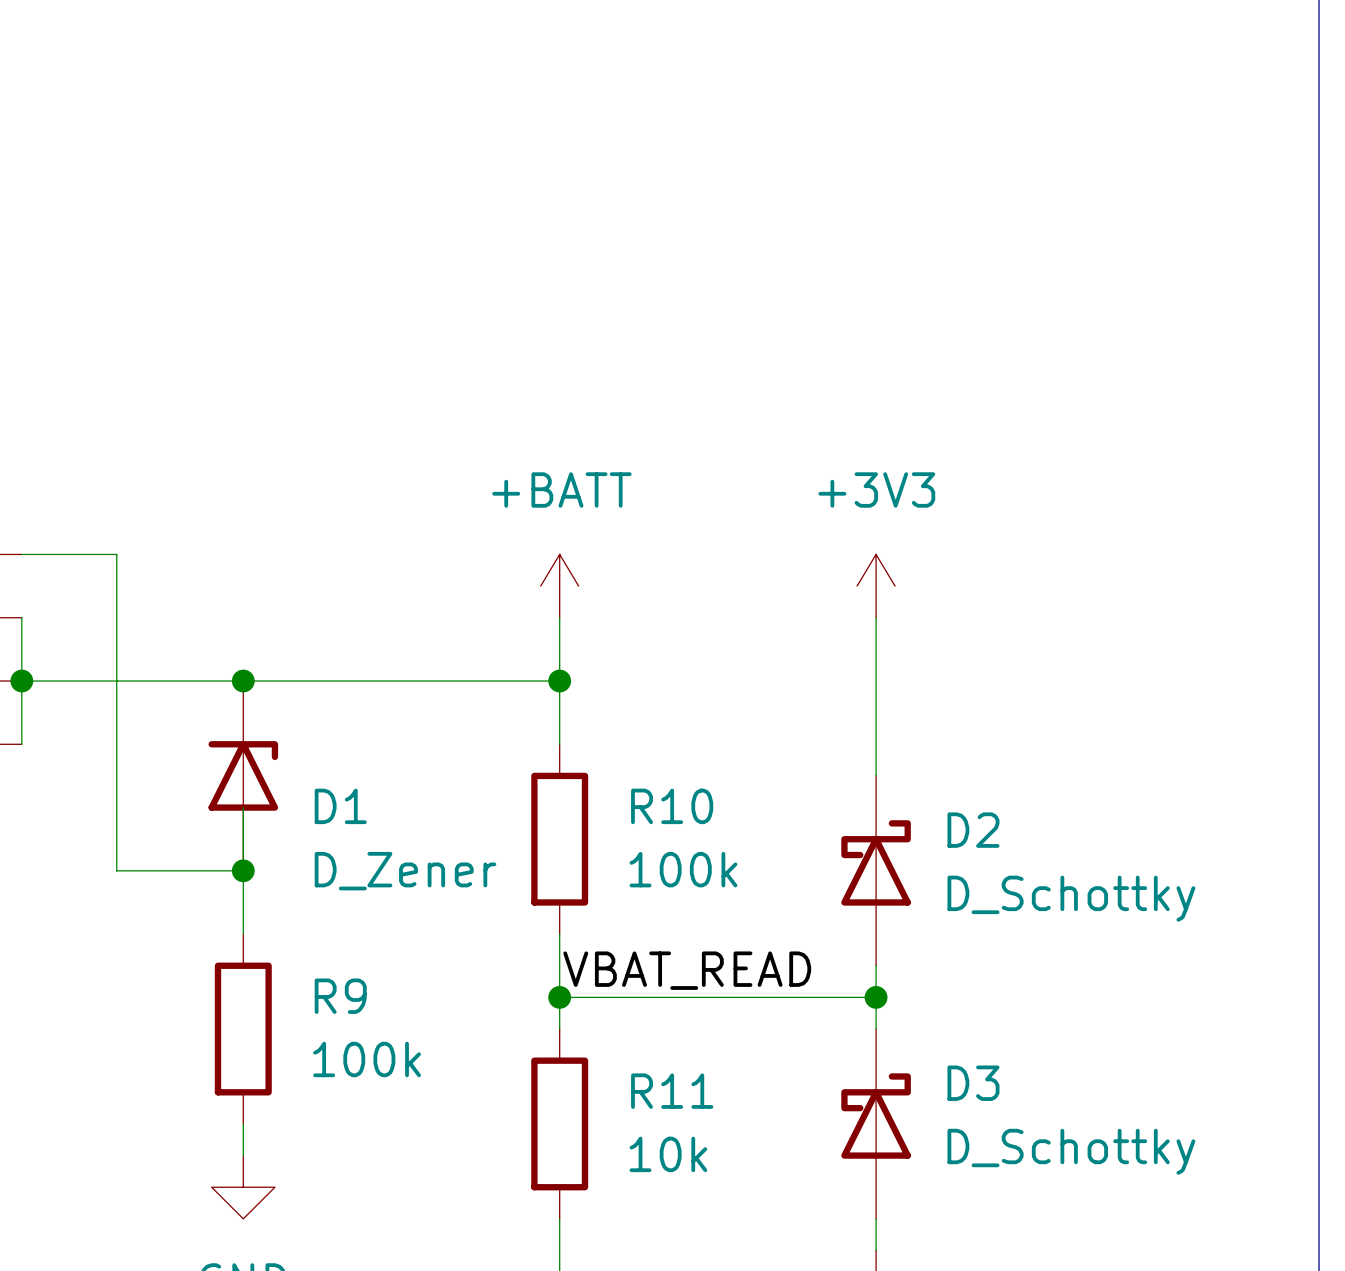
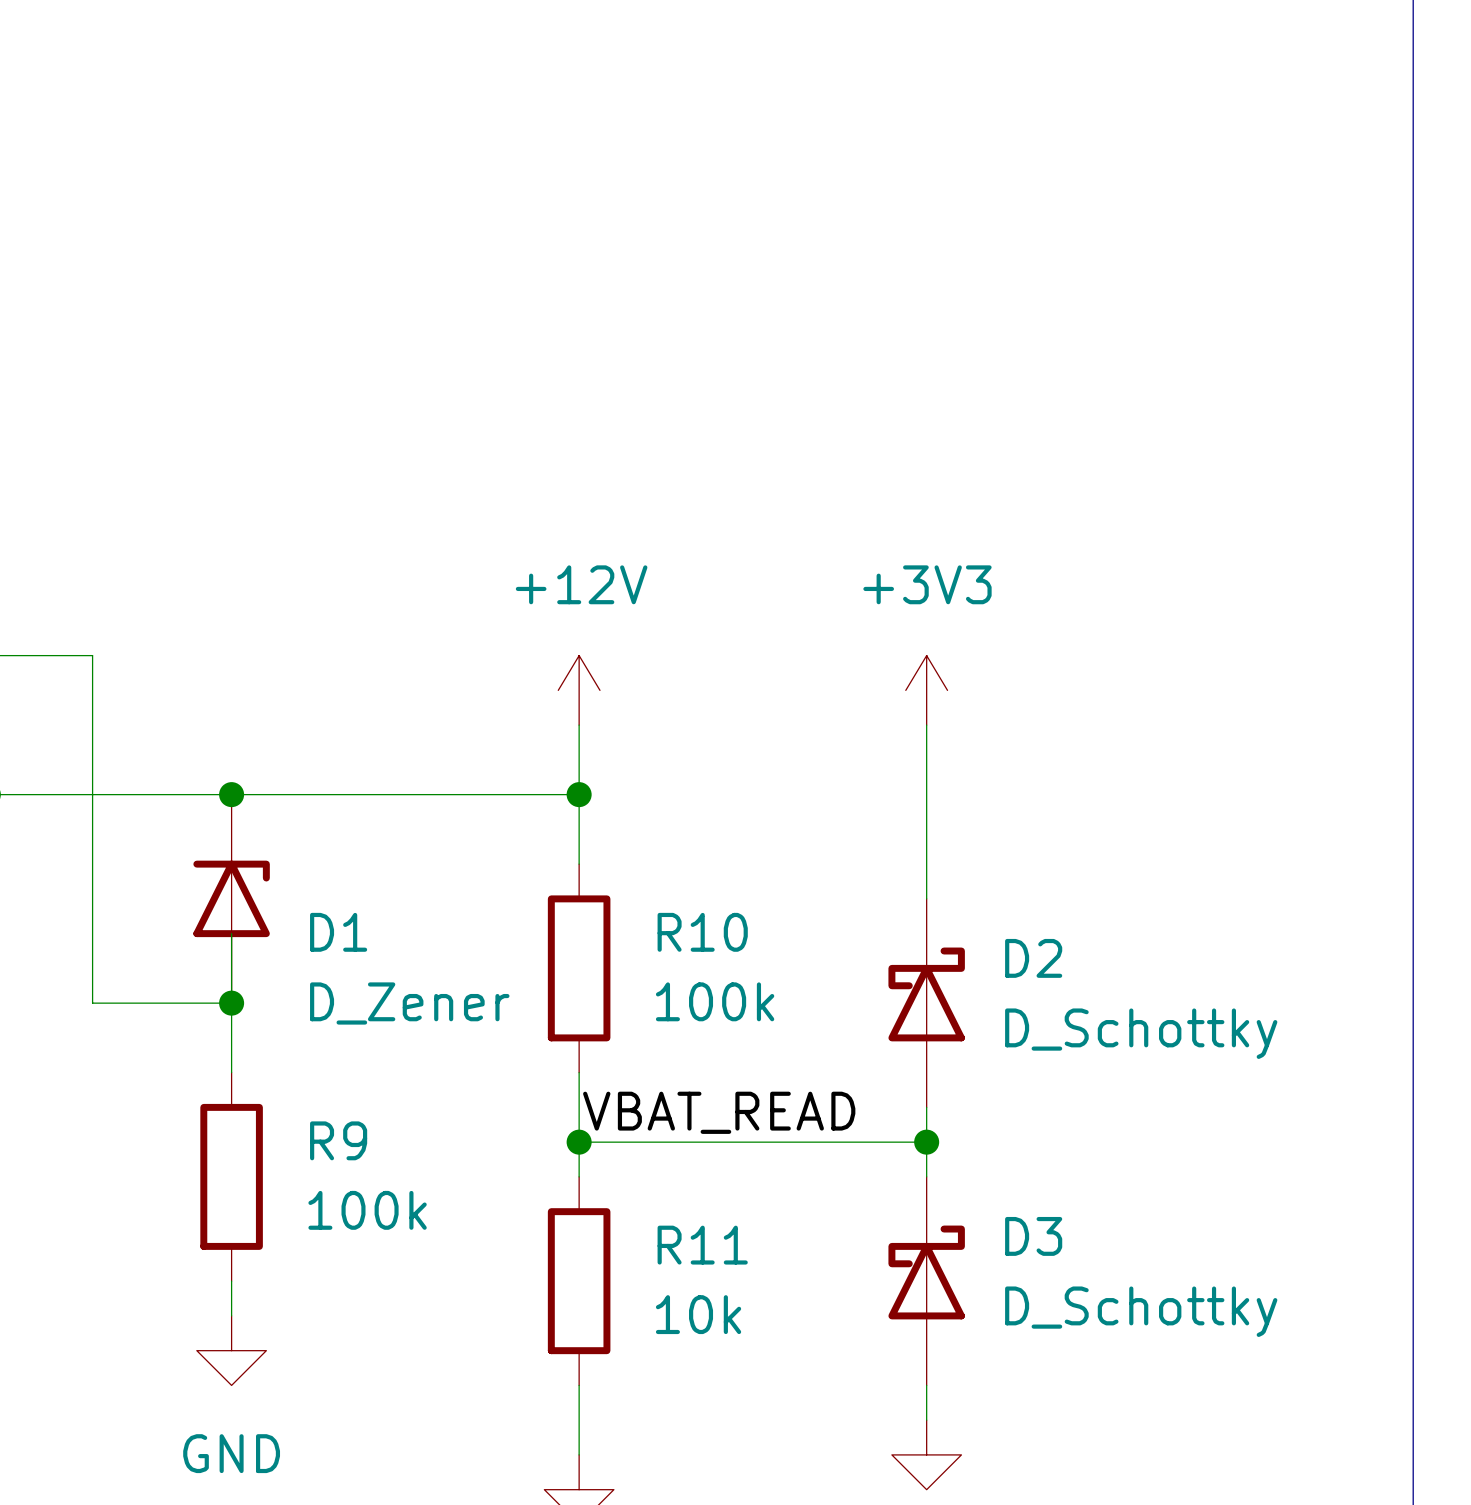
power symbol: +BATT (559, 586) -> +12V (579, 690)

